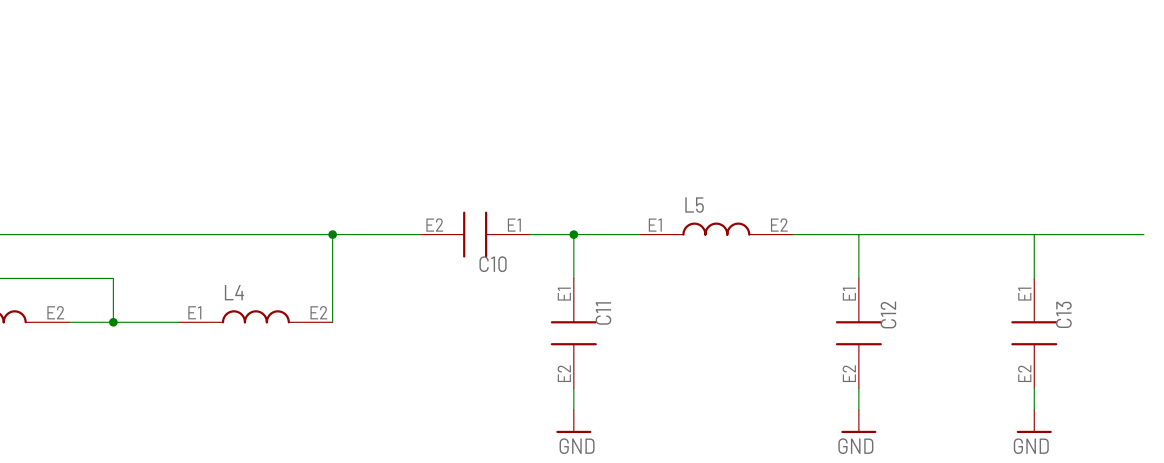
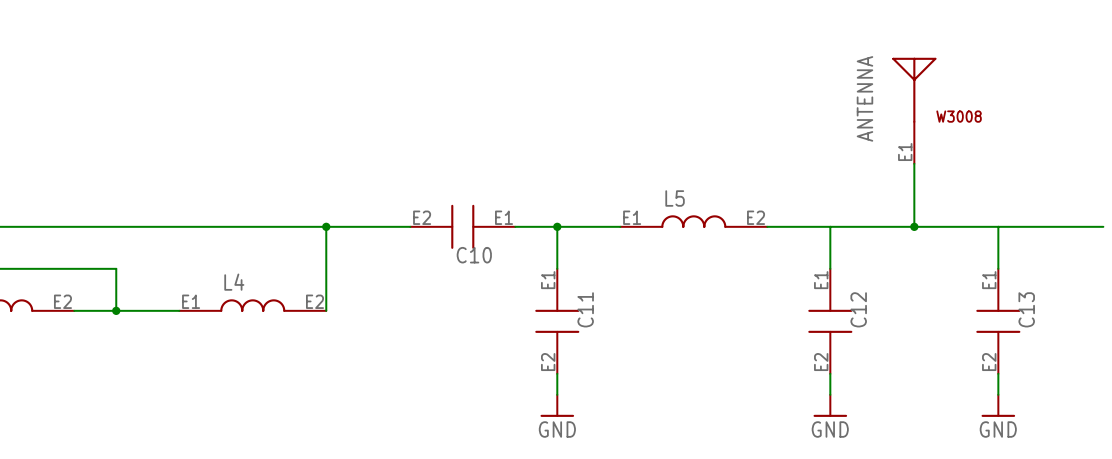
ANTENNA: none -> (914, 110)
wire: none -> (914, 163) (914, 226)
junction: none -> (914, 226)

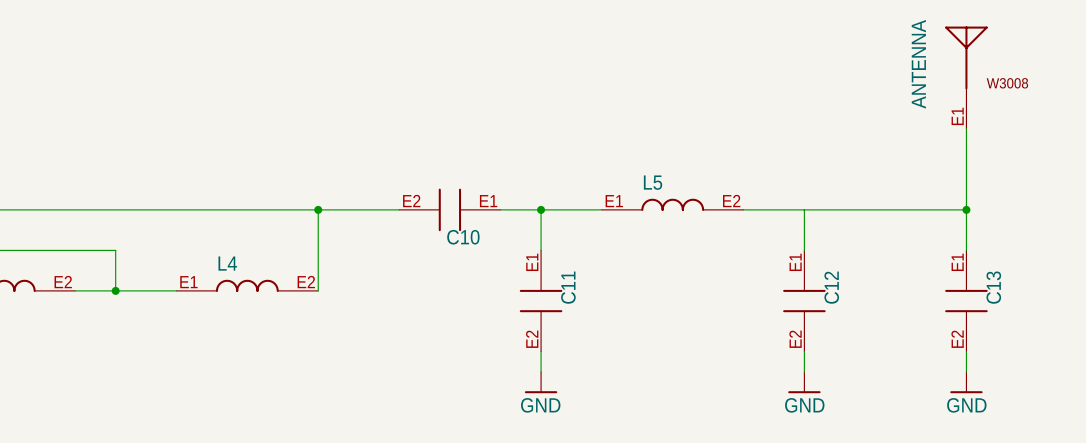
ANTENNA position: (914, 110) -> (966, 77)
wire: (914, 163) (914, 226) -> none
junction: (914, 226) -> none
wire: (998, 226) (1103, 226) -> (966, 209) (966, 128)
junction: none -> (966, 209)

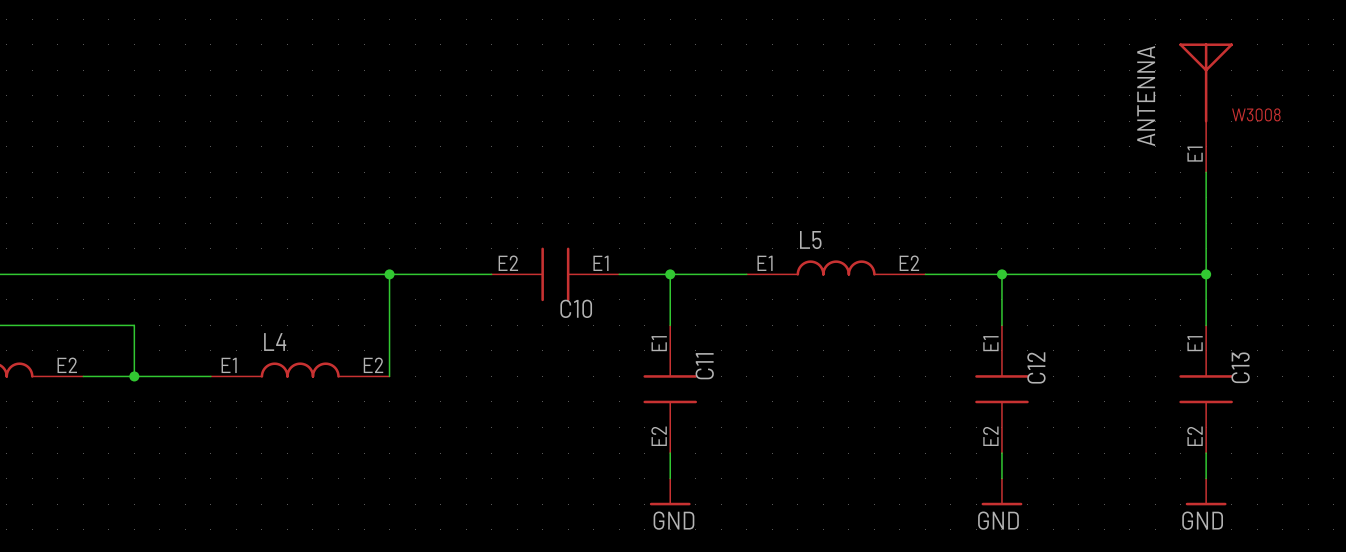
junction: none -> (1001, 274)

